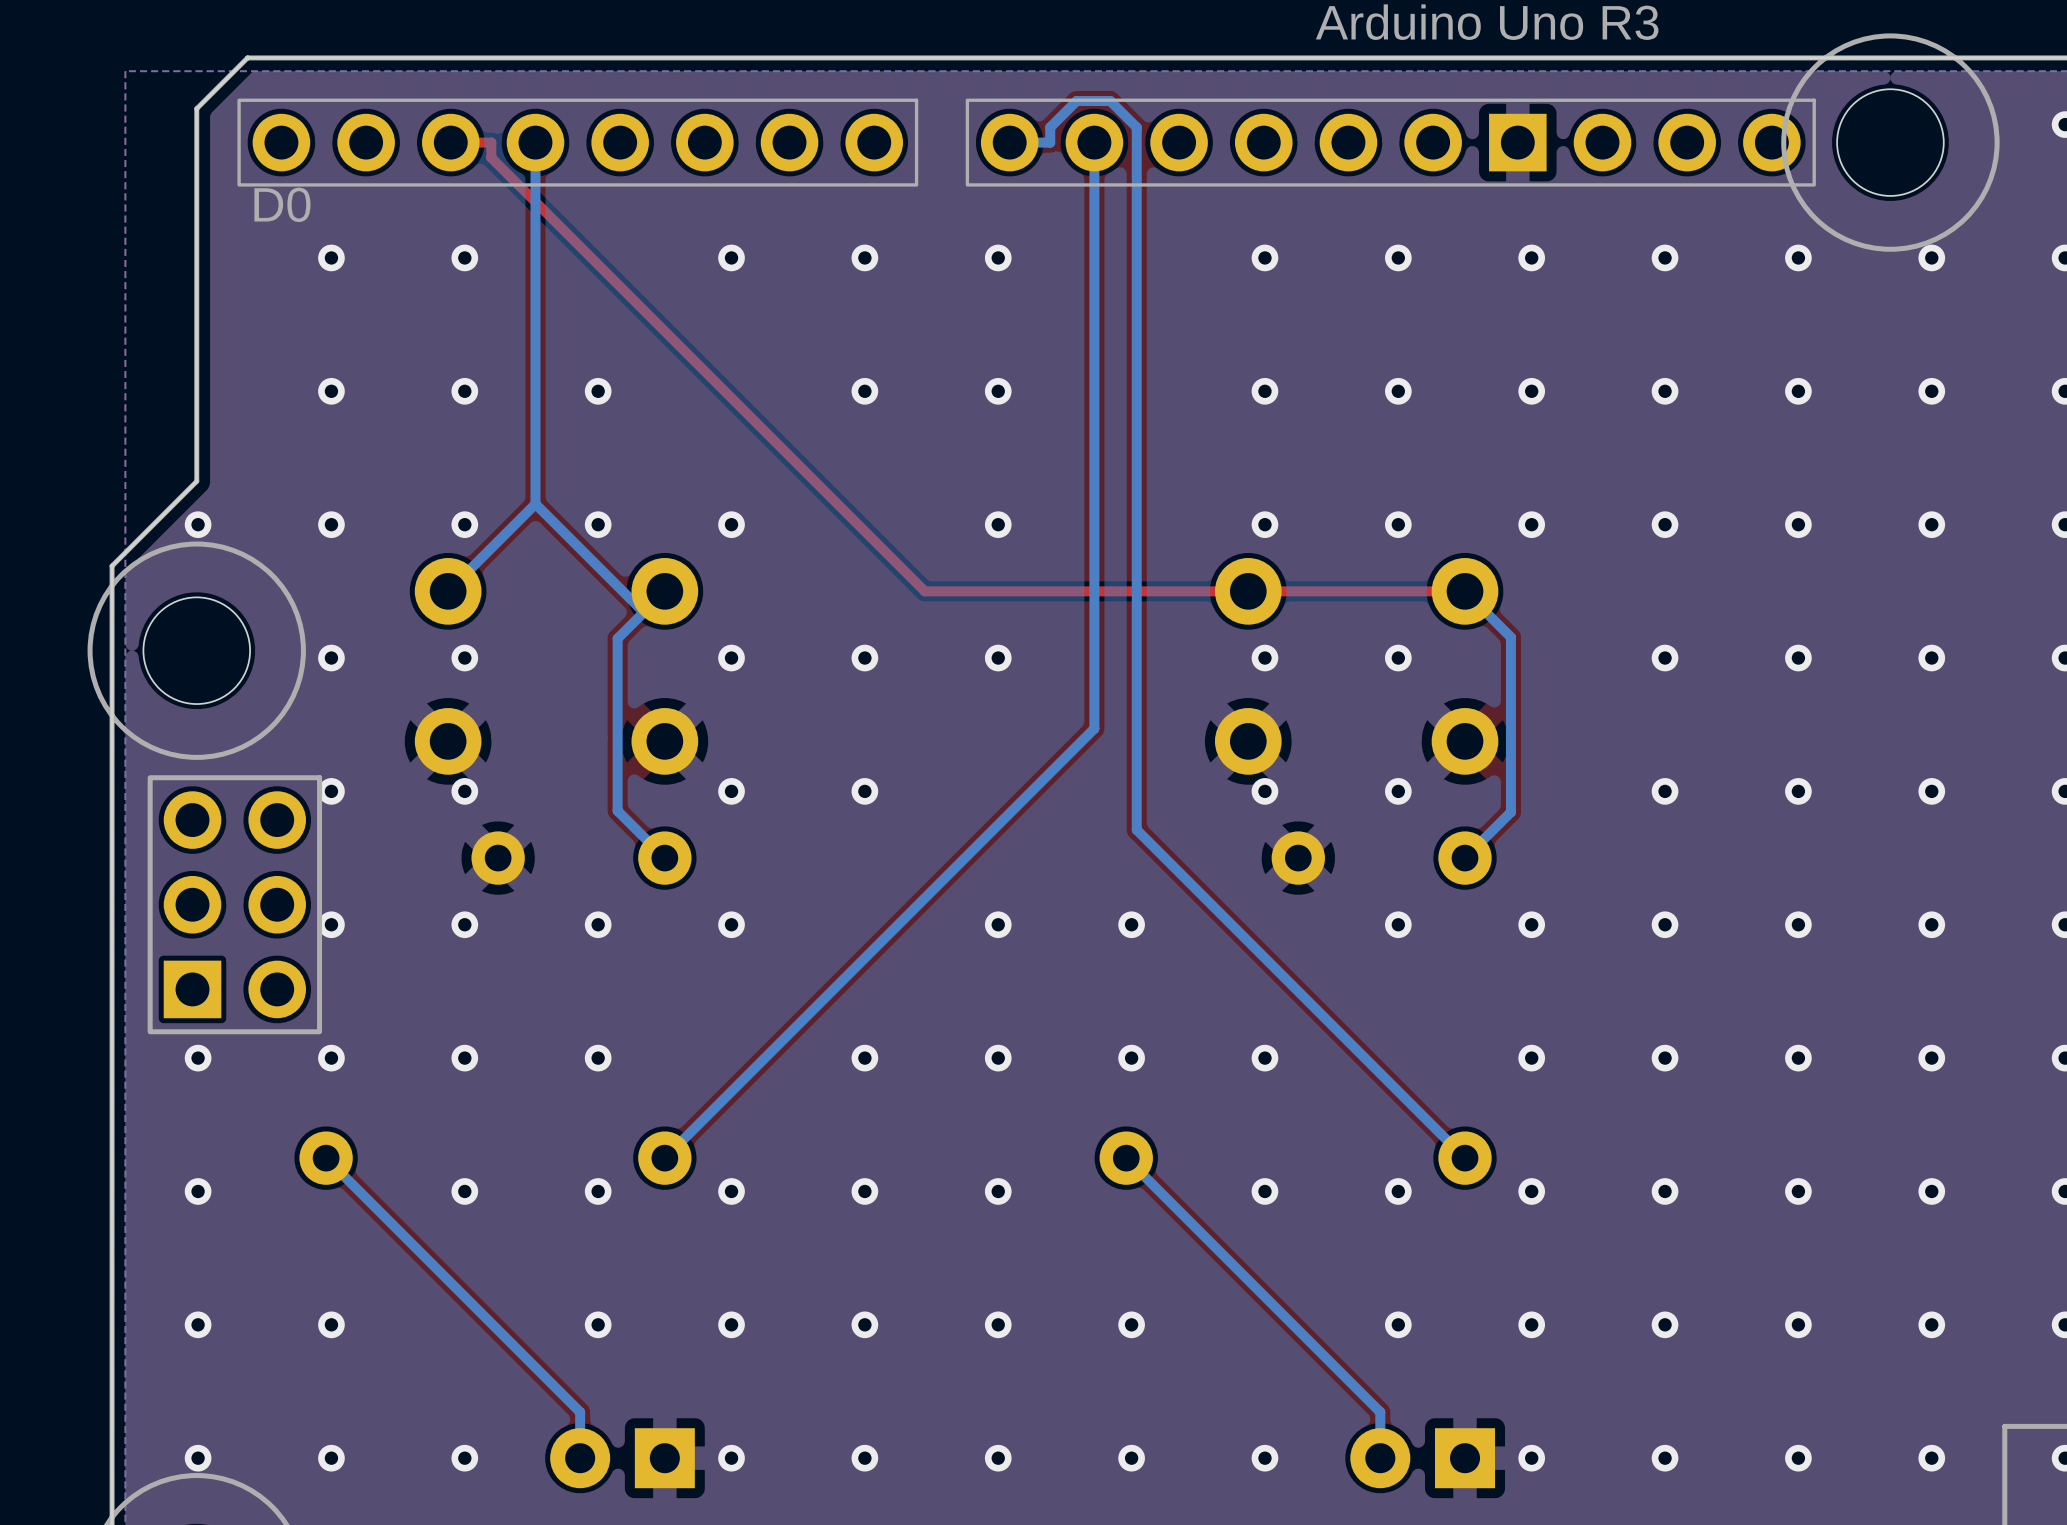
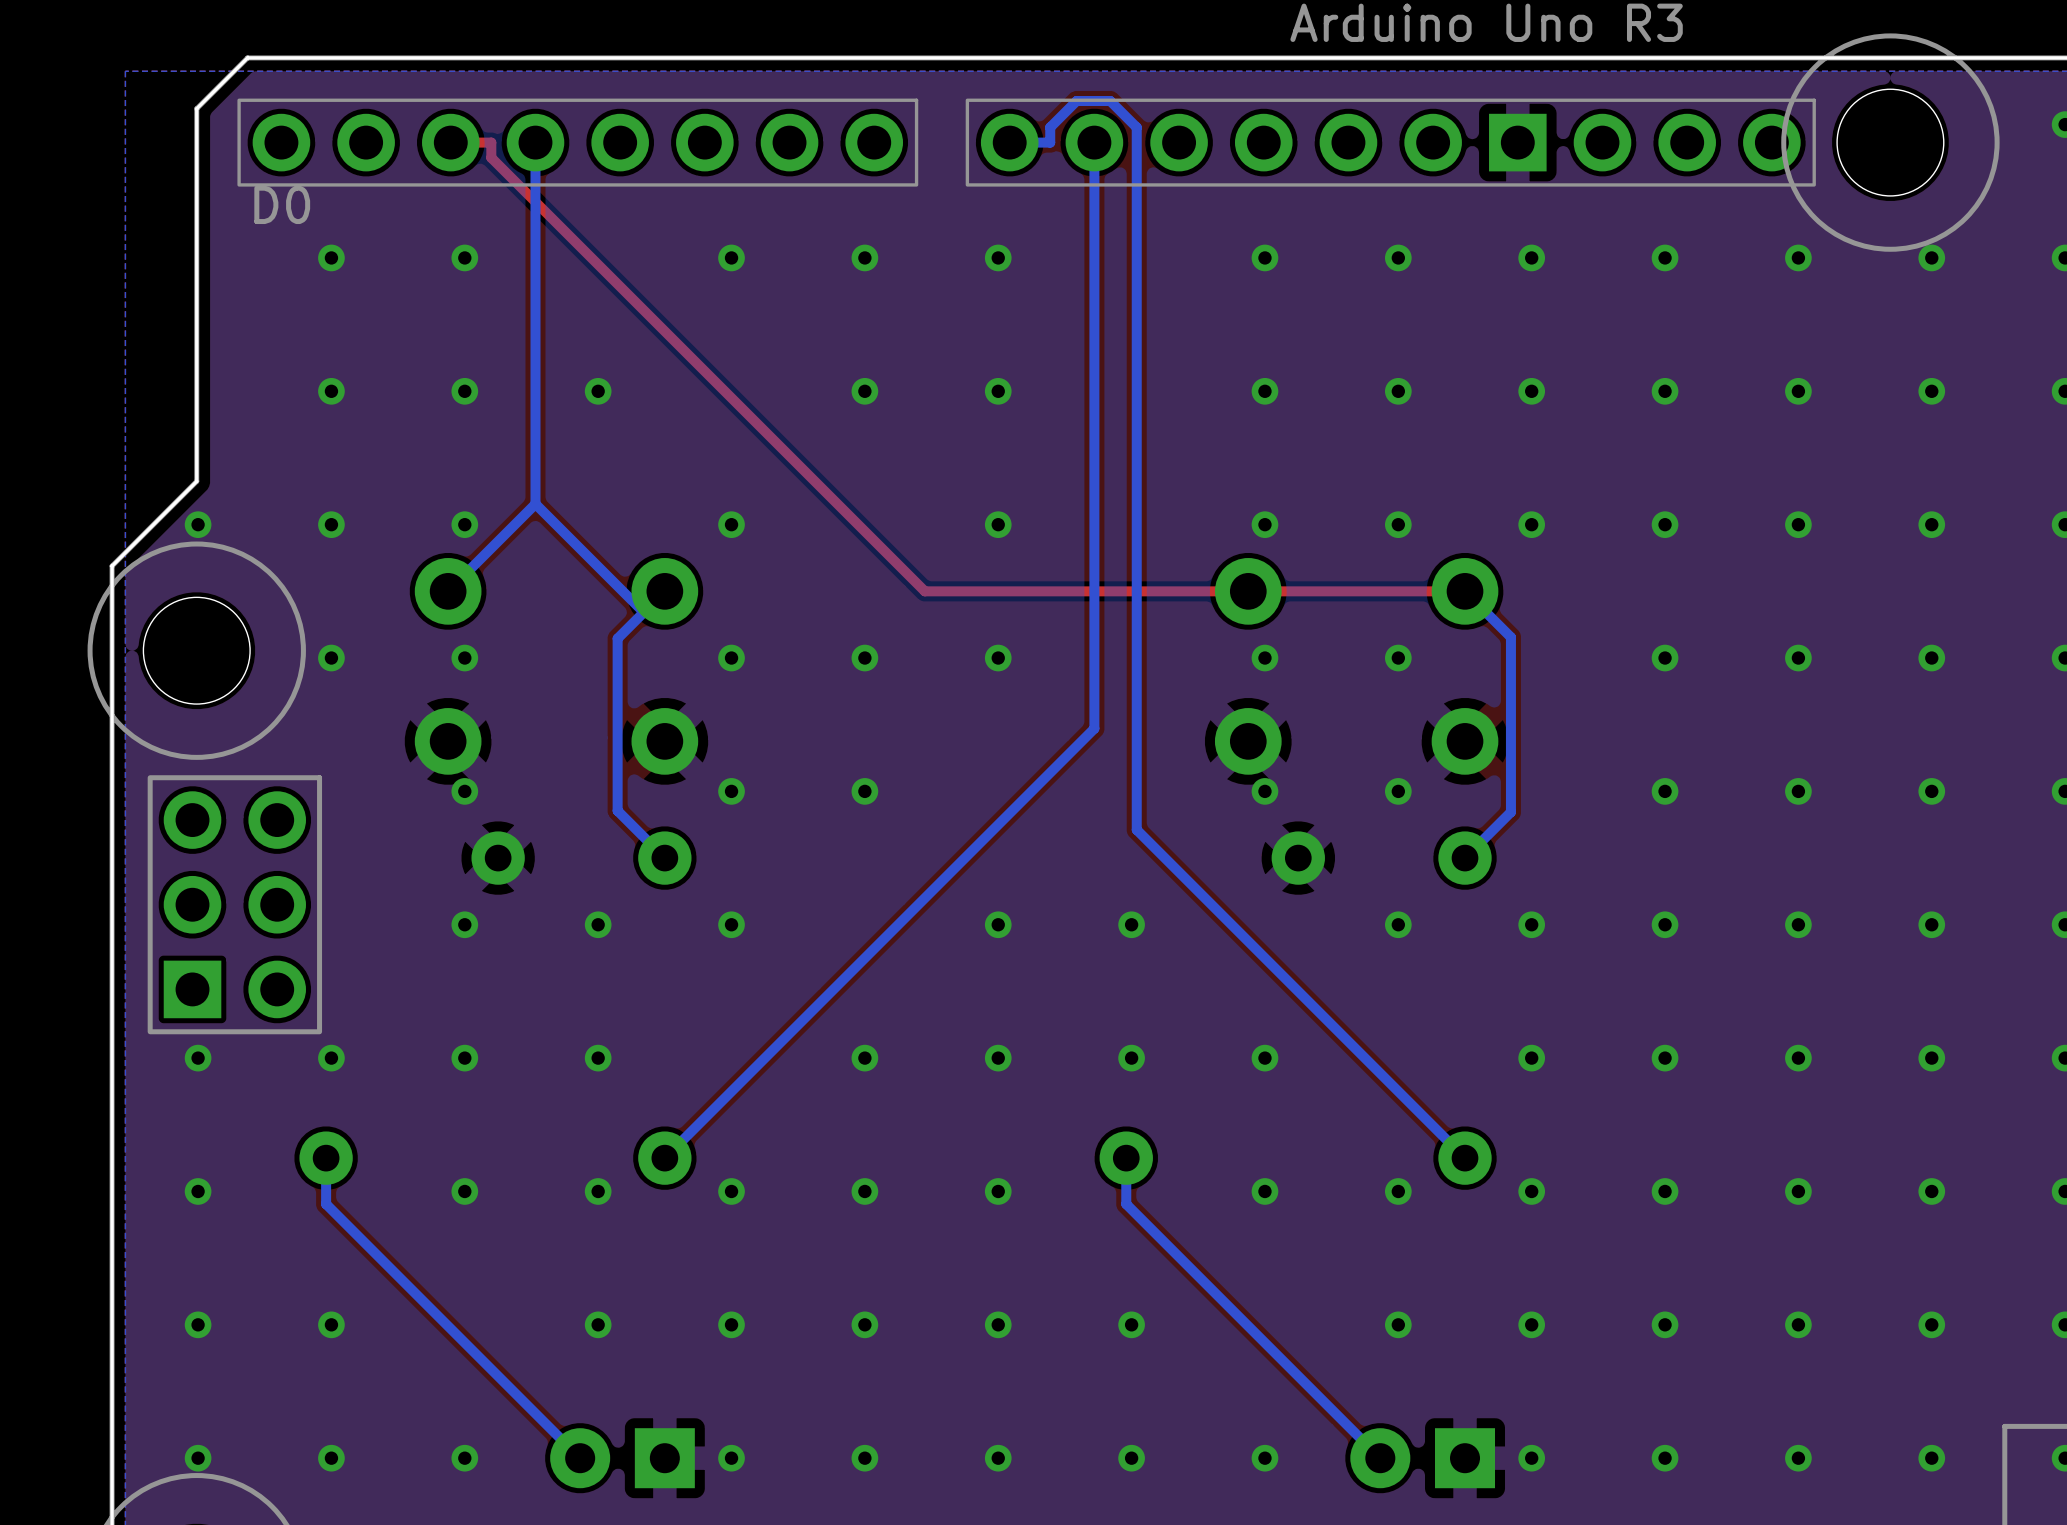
via: (598, 524) -> none
via: (331, 791) -> none
via: (331, 924) -> none
bottom track: (326, 1158) (580, 1412) (580, 1458) -> (326, 1158) (326, 1204) (580, 1458)
bottom track: (1126, 1158) (1380, 1412) (1380, 1458) -> (1126, 1158) (1126, 1204) (1380, 1458)

